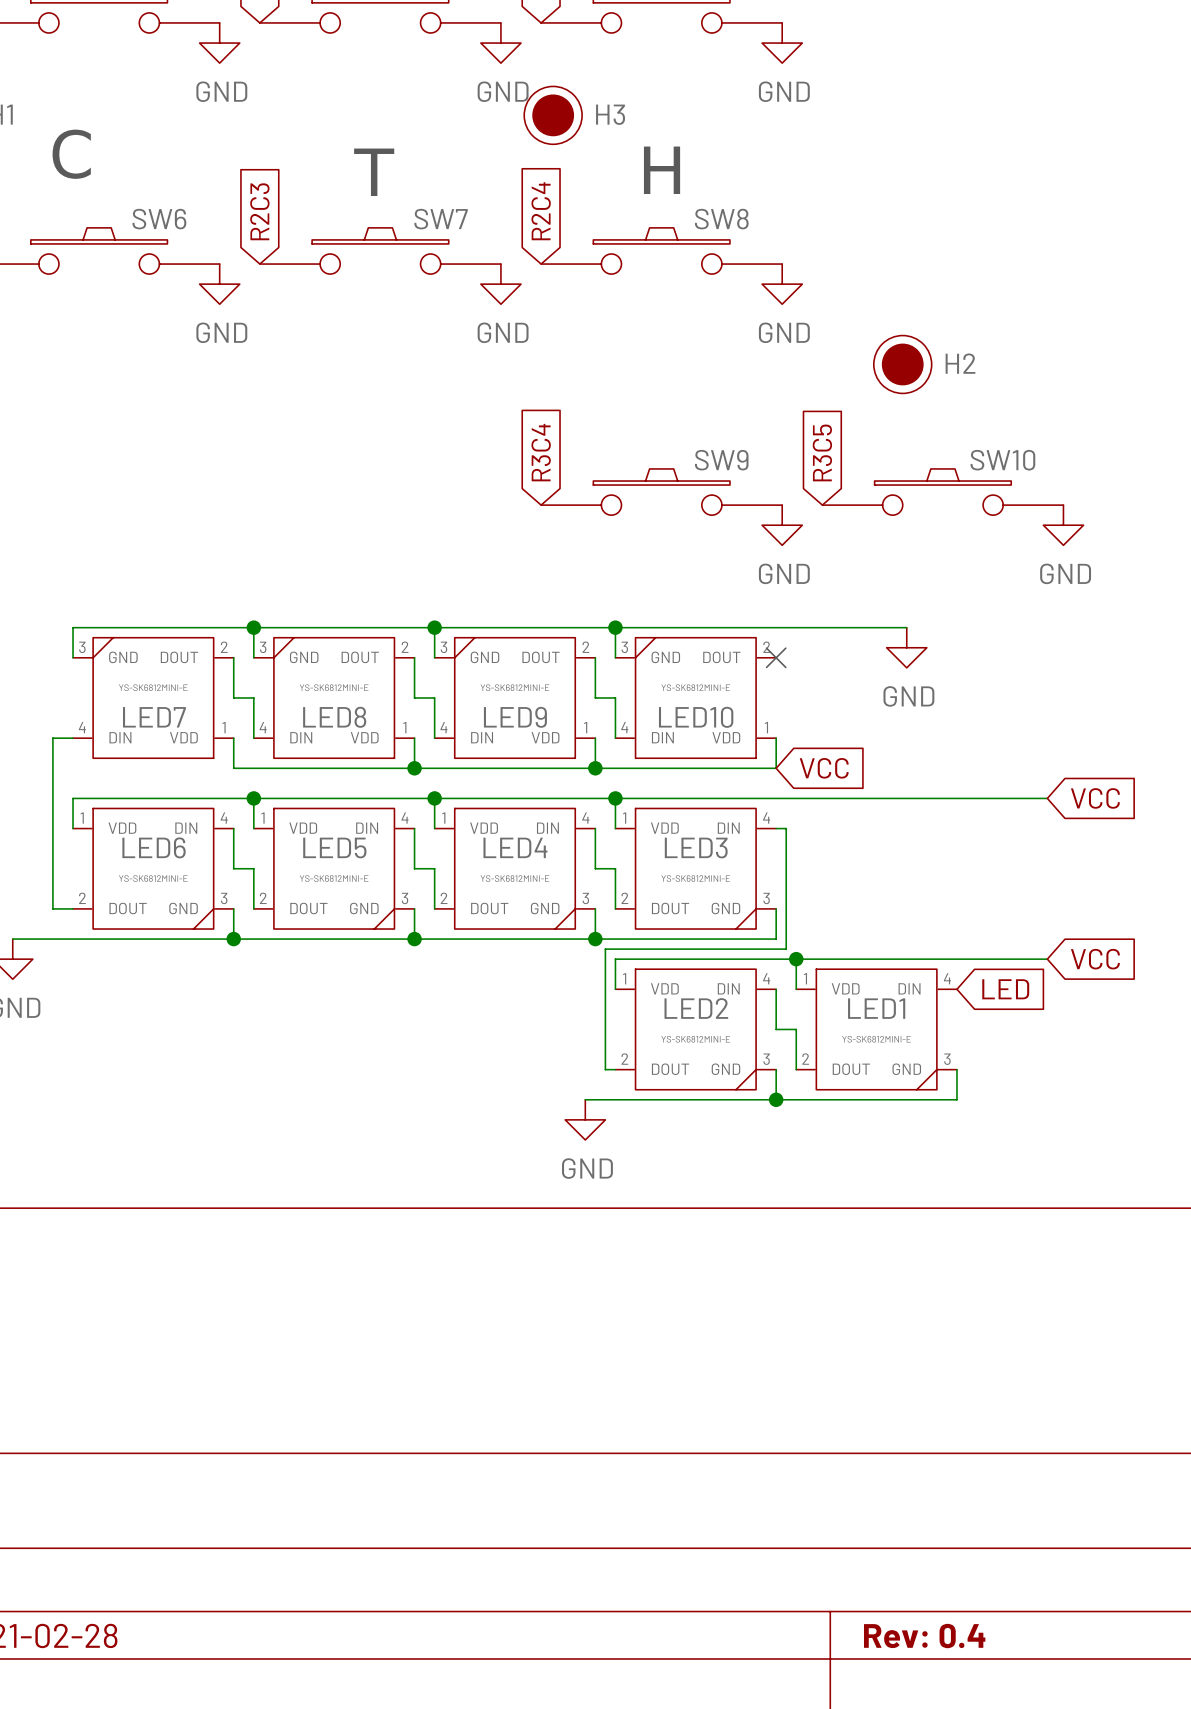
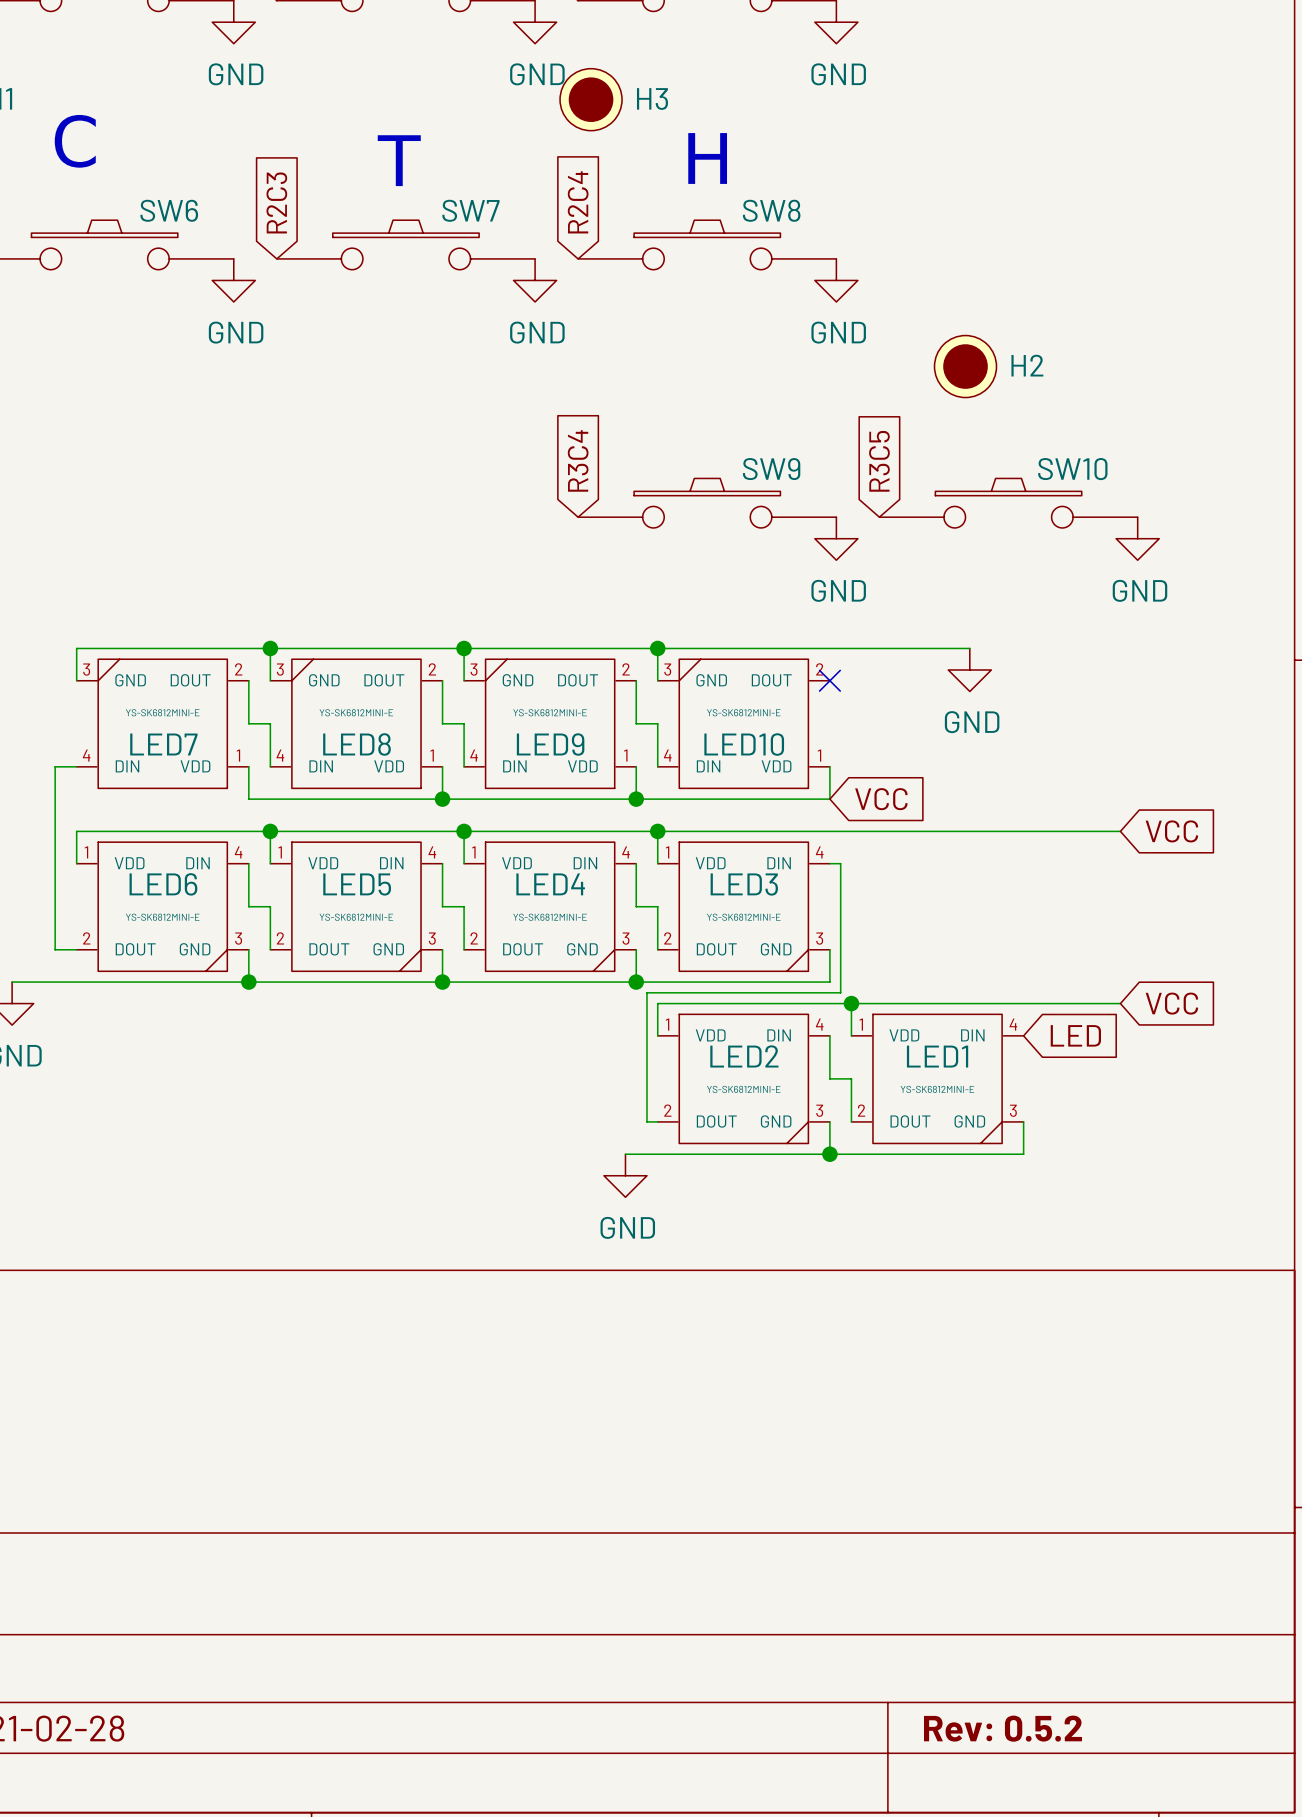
title block: Rev: 0.4 (924, 1636) -> Rev: 0.5.2 (1003, 1728)

